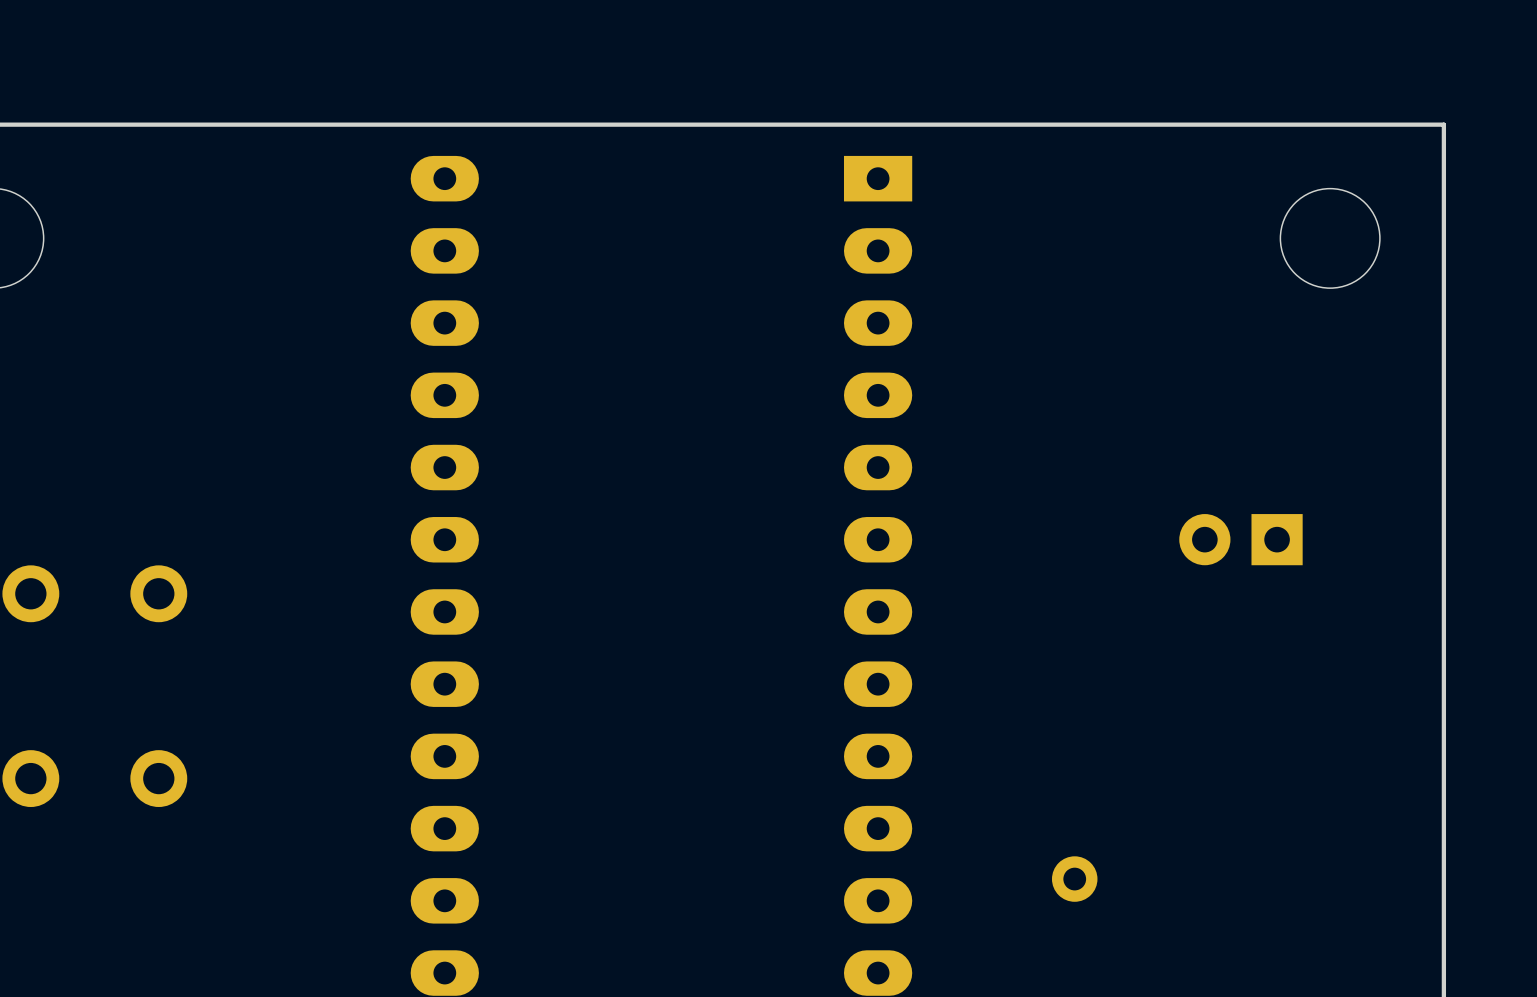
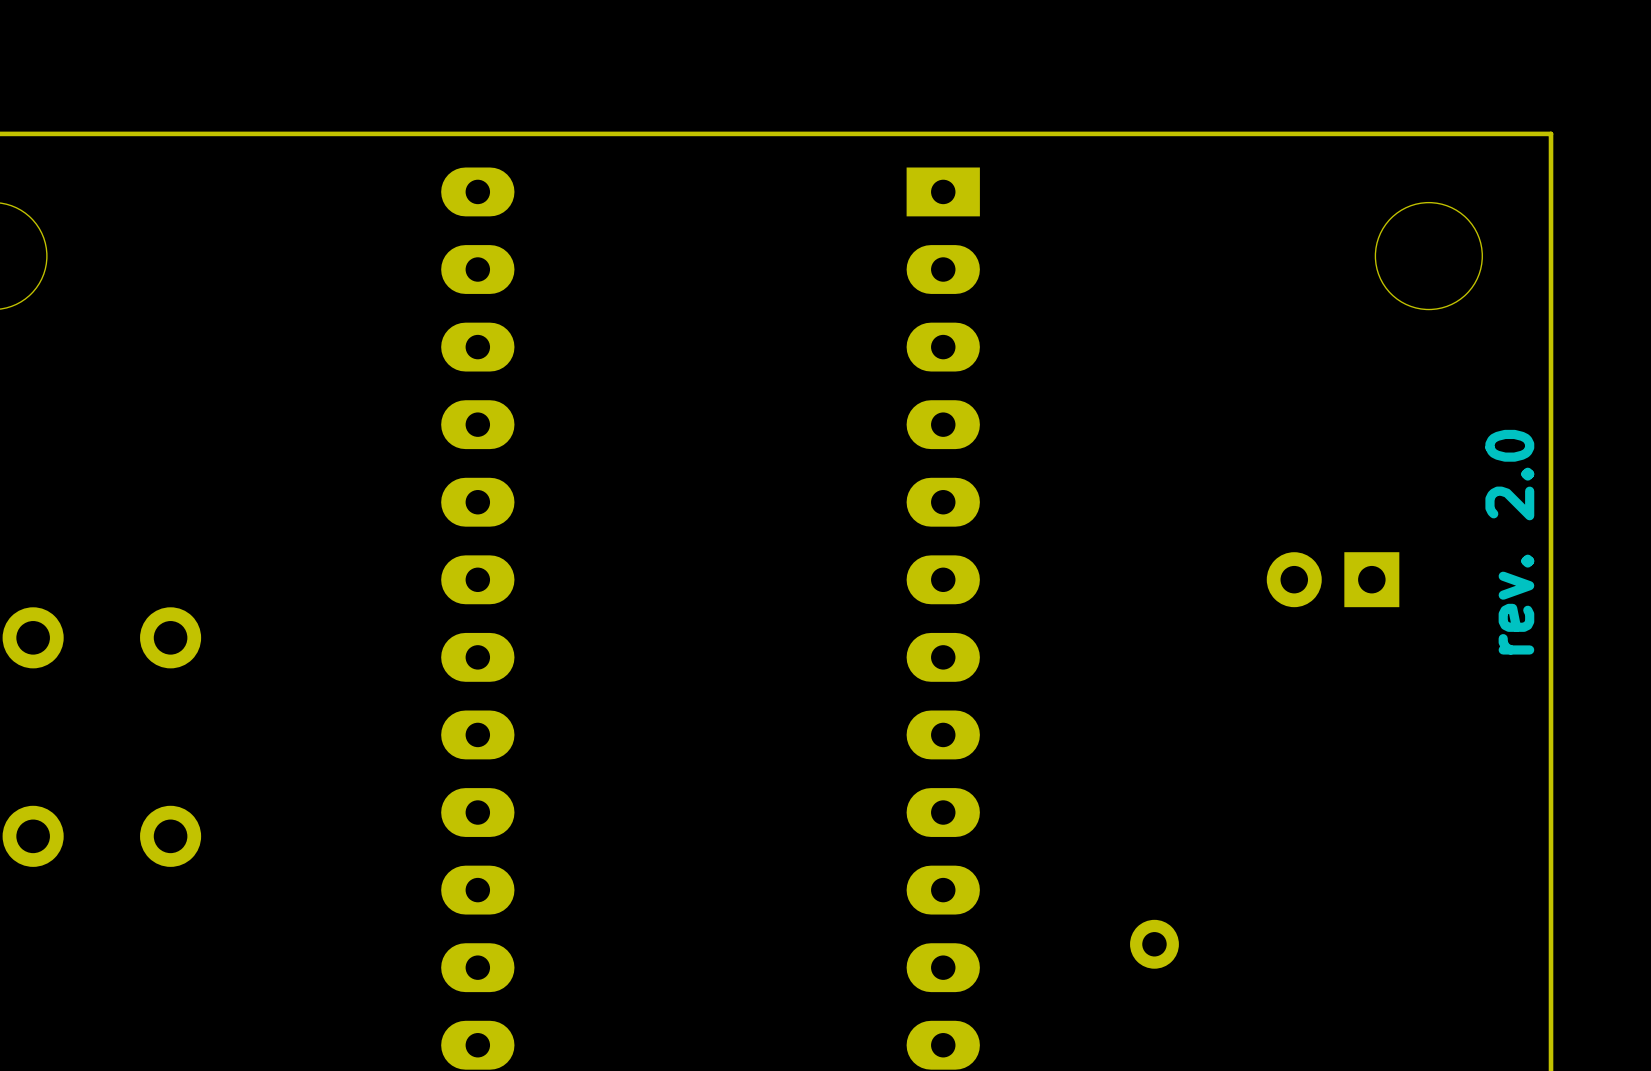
text: none -> rev. 2.0 (1509, 542)

